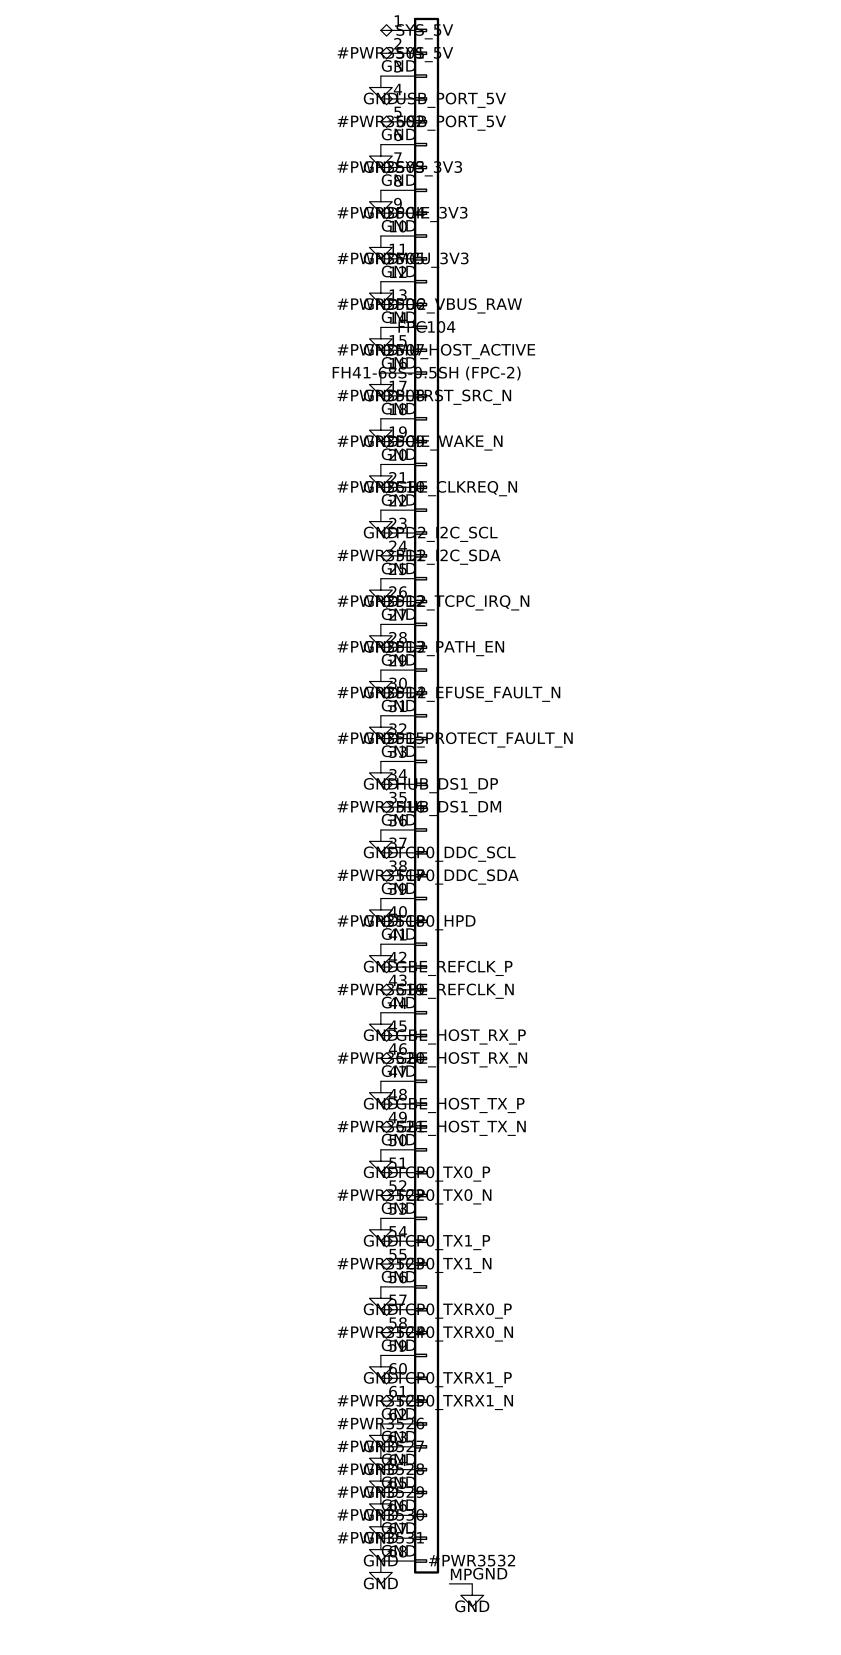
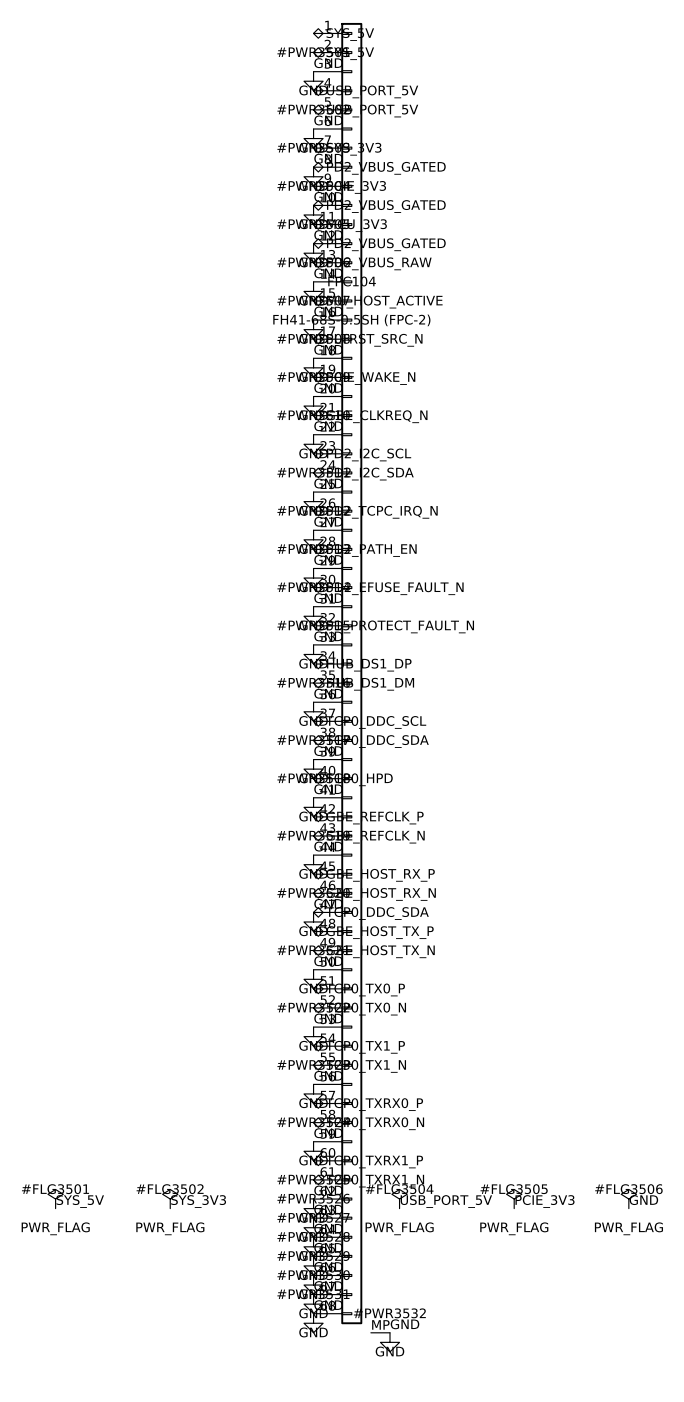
hierarchical label: none -> PD2_VBUS_GATED (386, 168)
hierarchical label: none -> PD2_VBUS_GATED (386, 206)
hierarchical label: none -> PD2_VBUS_GATED (386, 244)
hierarchical label: none -> TCP0_DDC_SDA (377, 913)
#FLG3501: none -> PWR_FLAG (55, 1199)
#FLG3502: none -> PWR_FLAG (170, 1199)
#FLG3504: none -> PWR_FLAG (399, 1199)
#FLG3505: none -> PWR_FLAG (514, 1199)
#FLG3506: none -> PWR_FLAG (628, 1199)
label: none -> GND (643, 1200)
label: none -> SYS_5V (80, 1201)
label: none -> SYS_3V3 (198, 1201)
label: none -> USB_PORT_5V (446, 1201)
label: none -> PCIE_3V3 (545, 1201)

